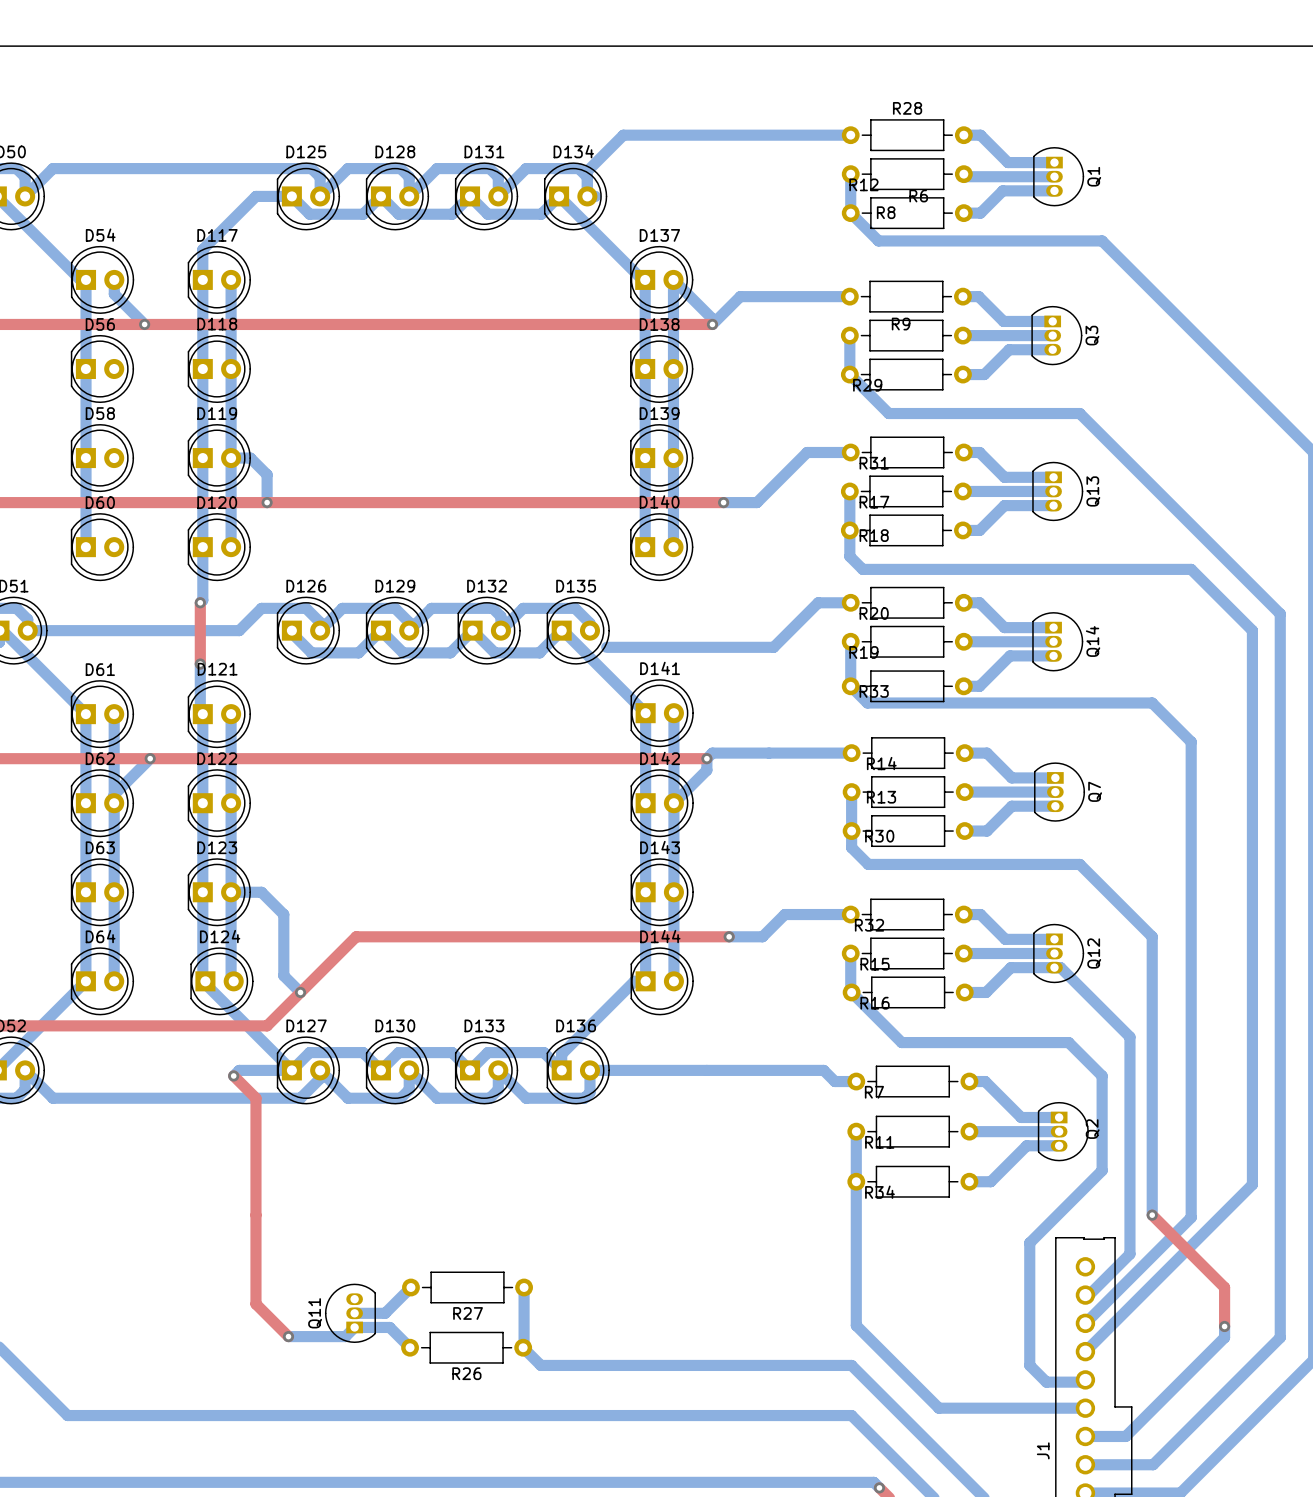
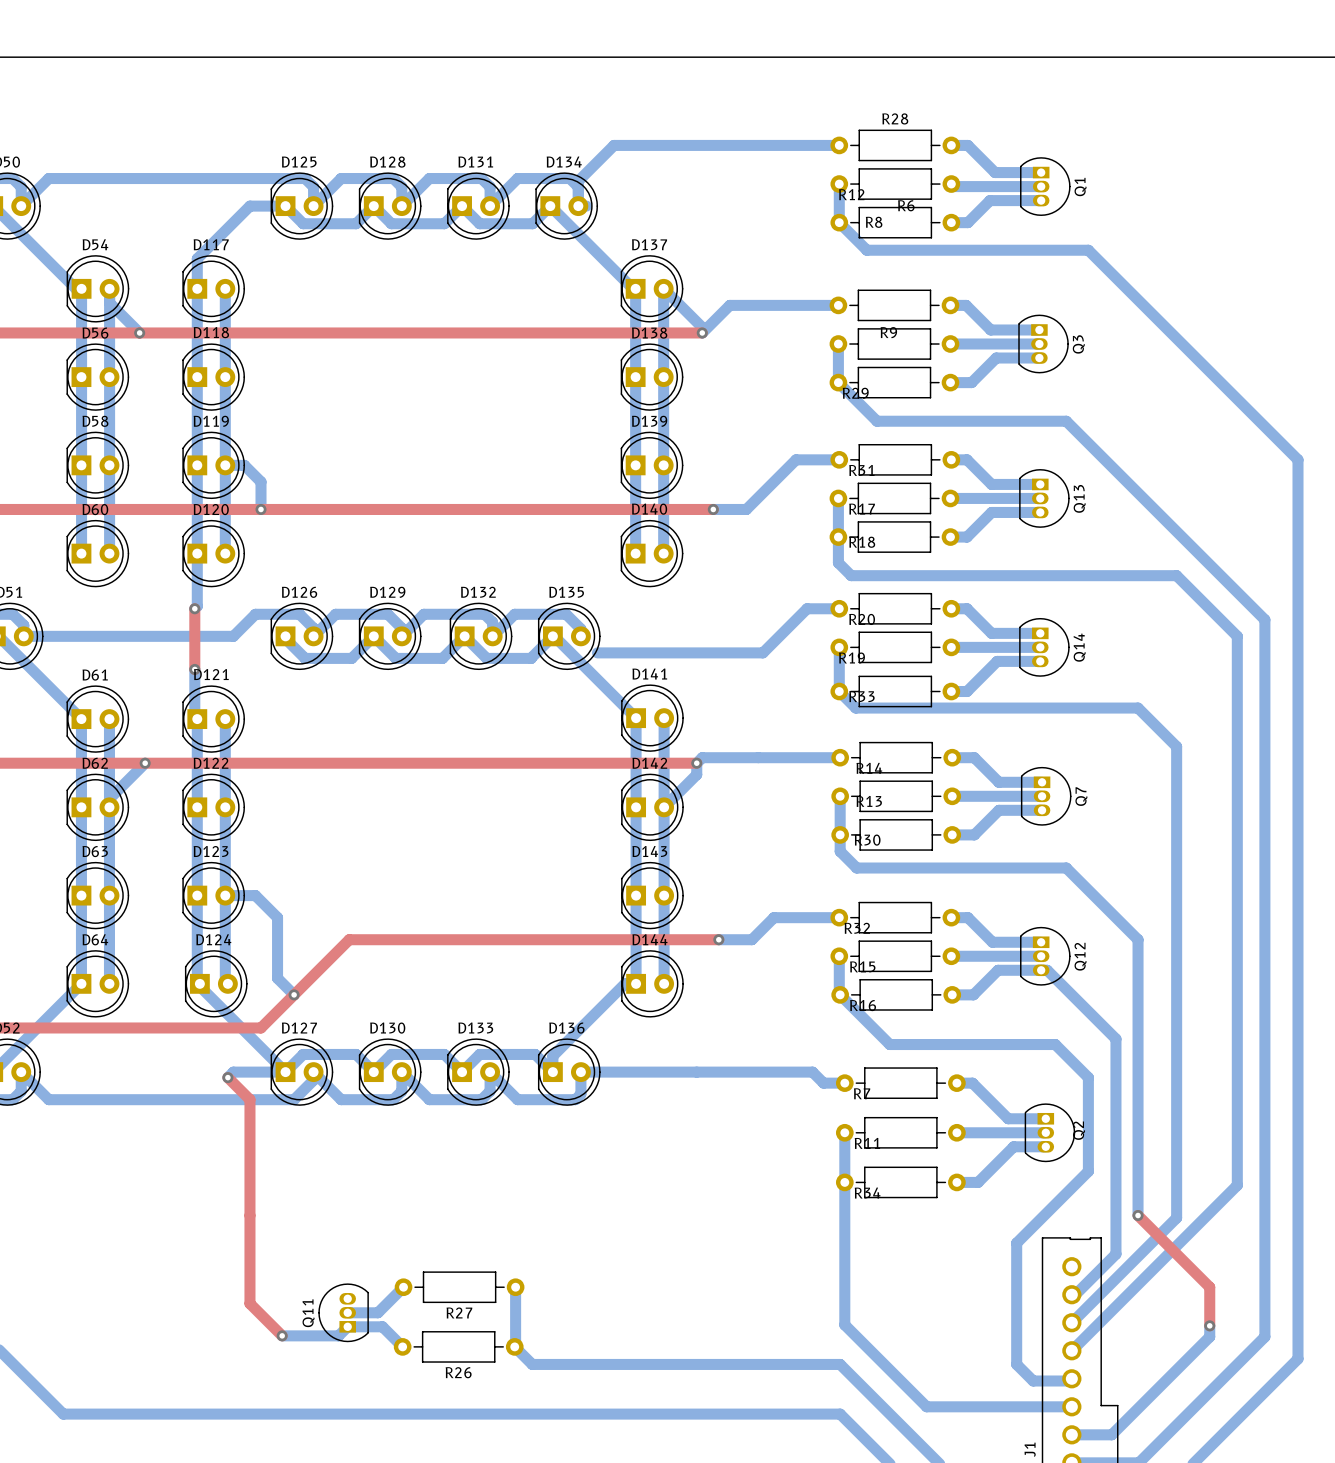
bottom track: none -> (109, 302) (109, 553)

